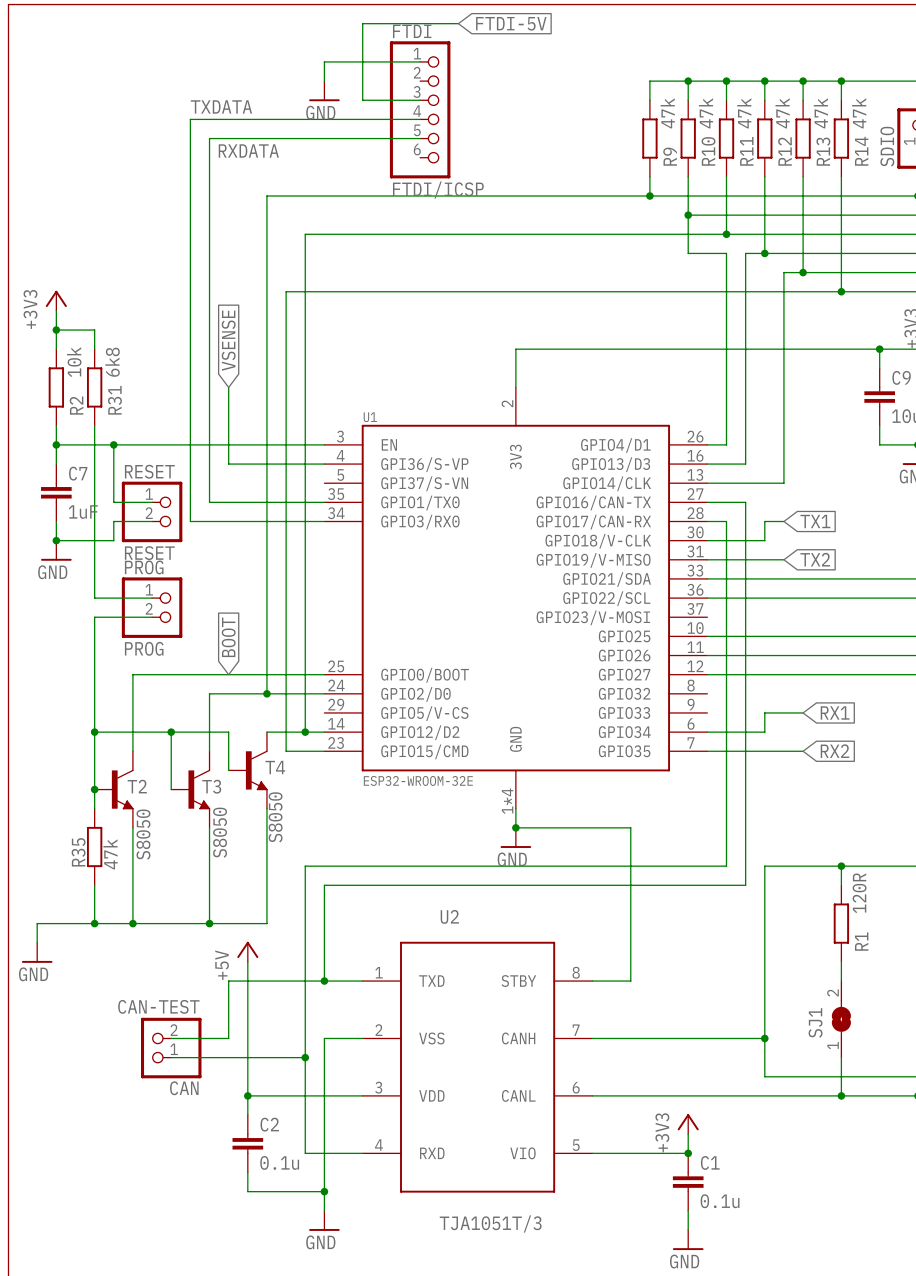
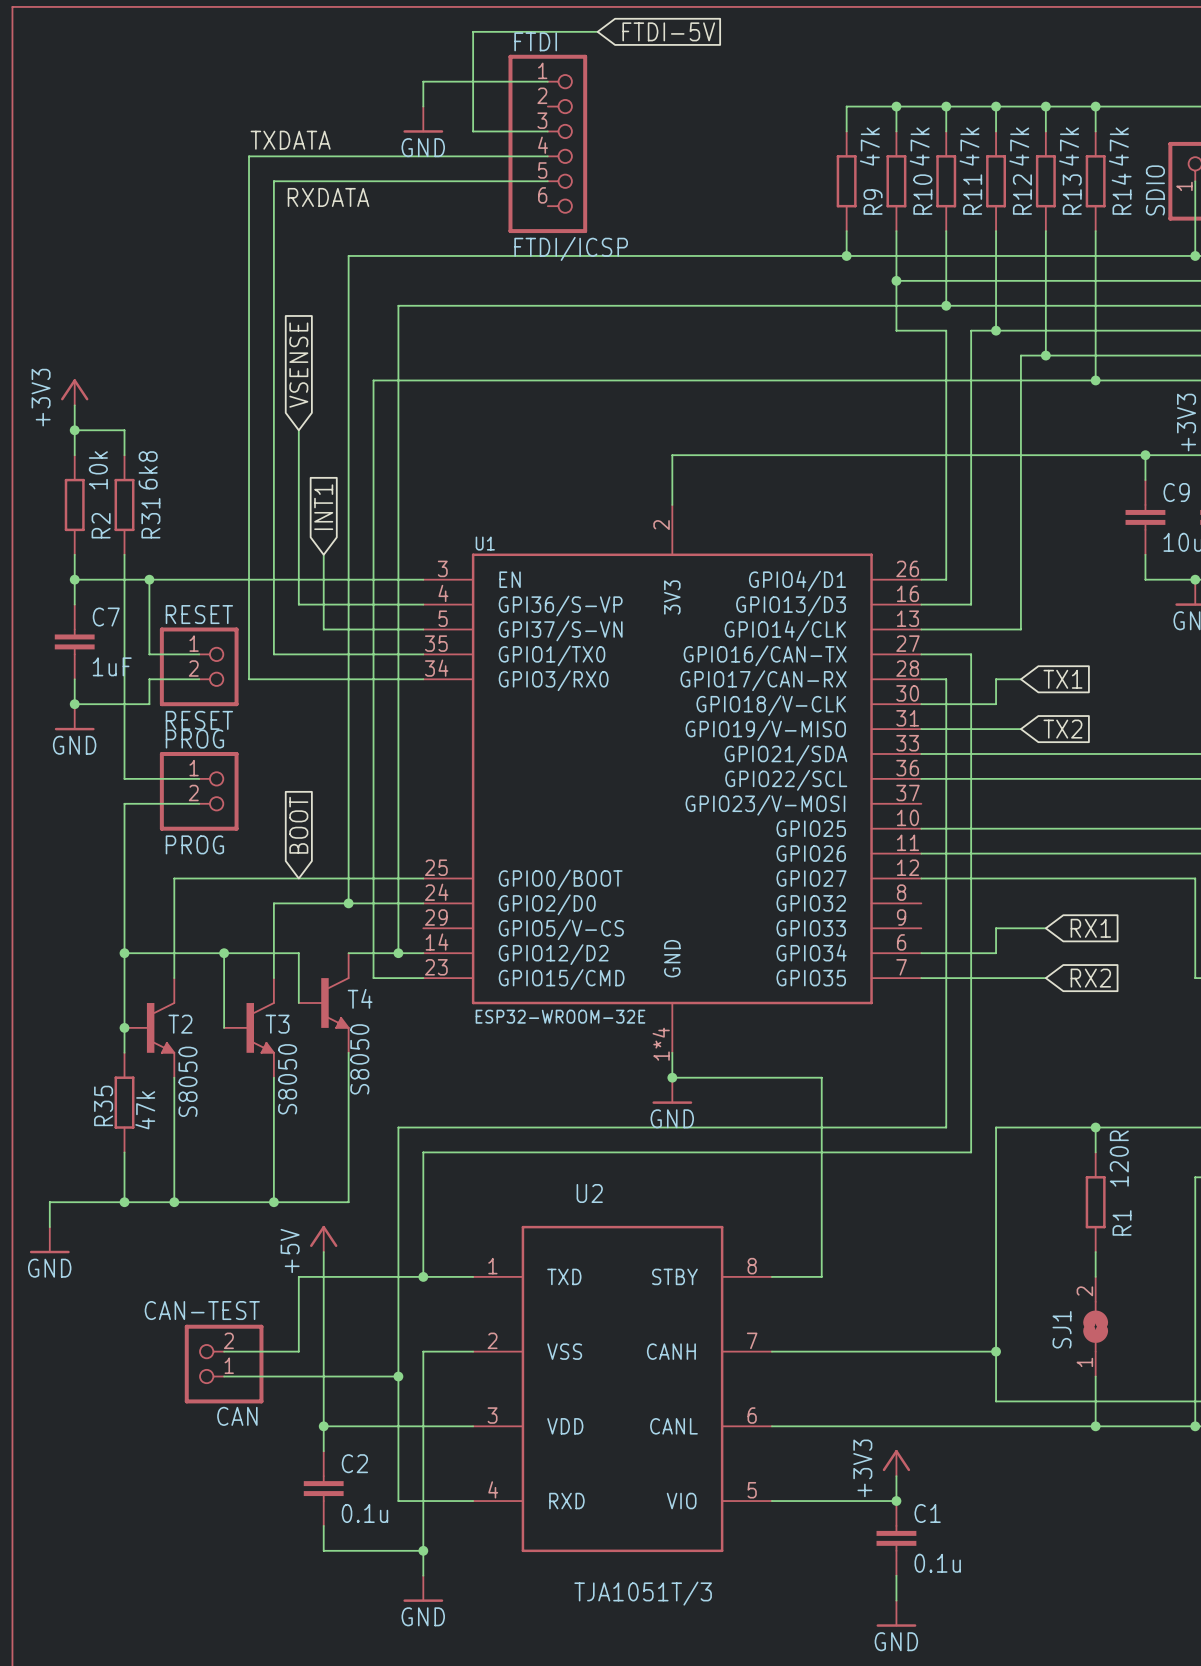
wire: none -> (298, 430) (298, 504)
global label position: VSENSE (228, 340) -> VSENSE (298, 365)
global label: none -> INT1 (323, 507)
wire: none -> (323, 554) (323, 629) (423, 629)

